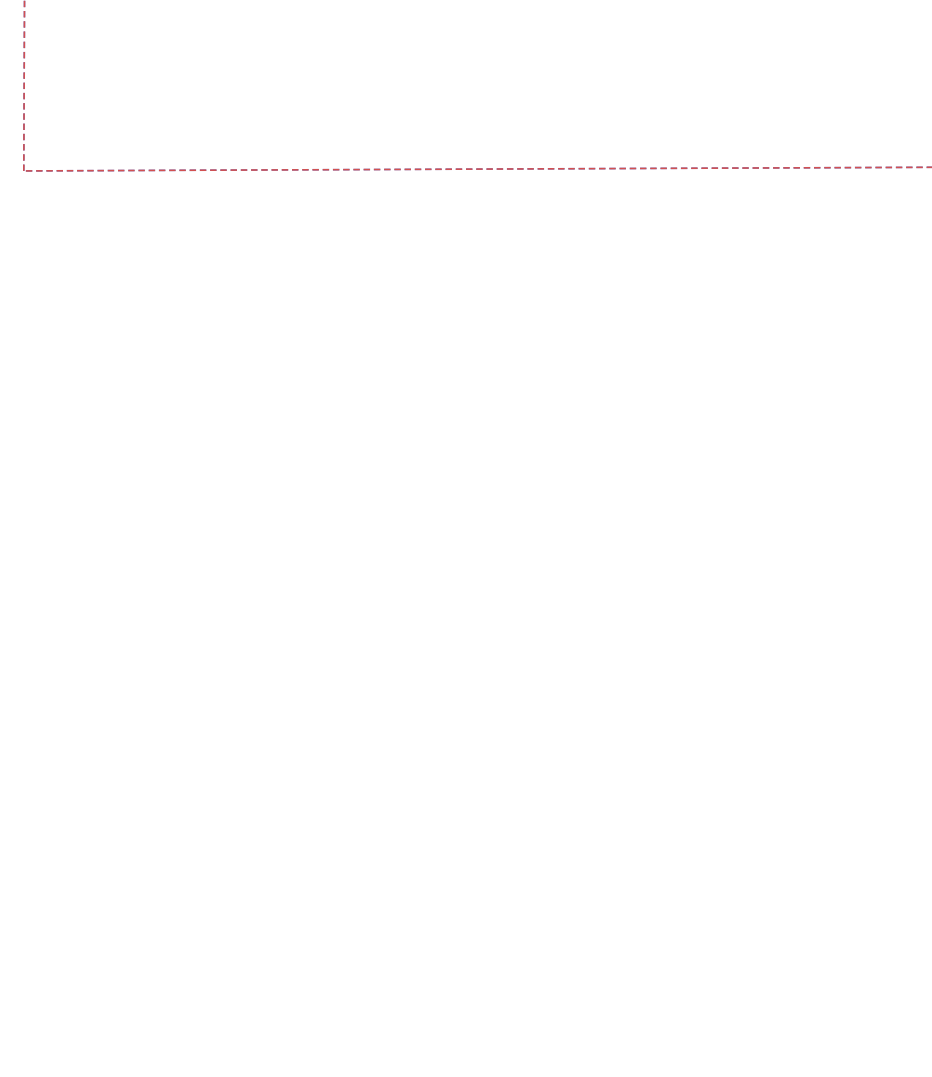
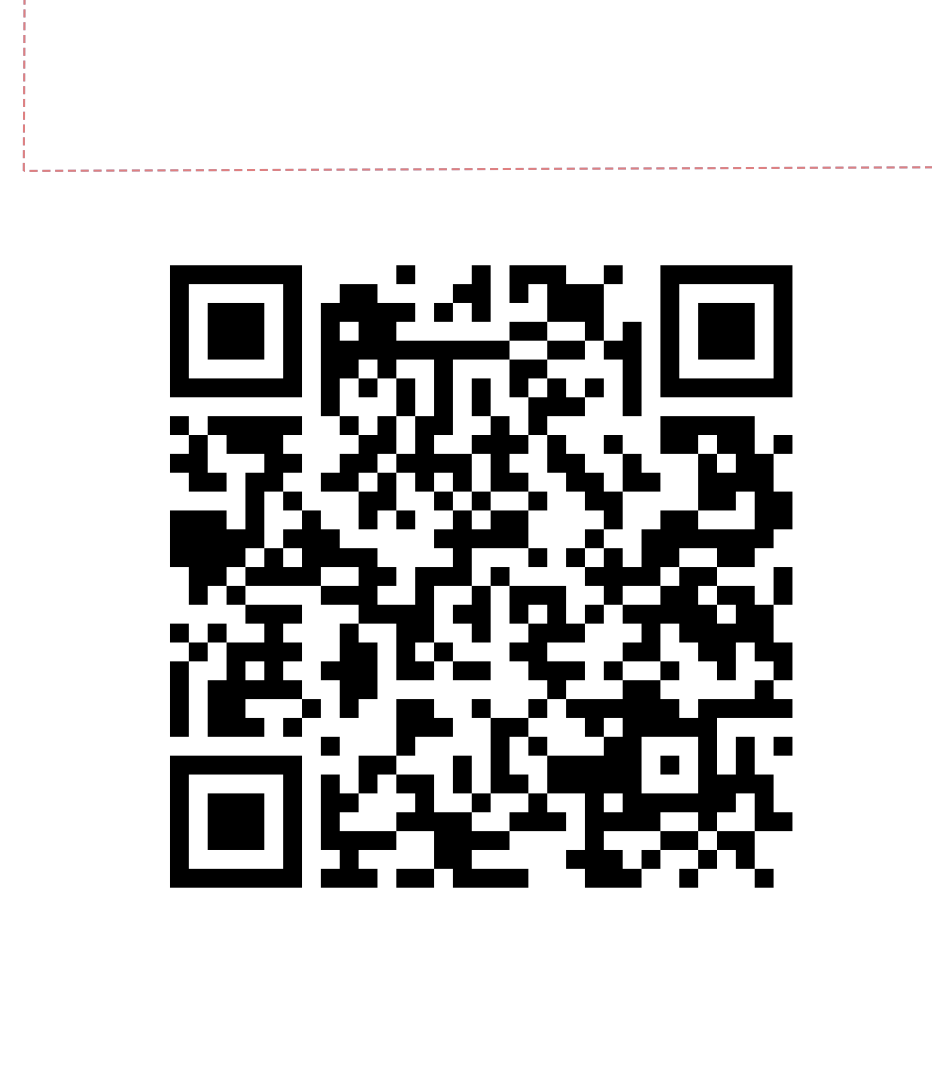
drawing: none -> [169, 265, 793, 888]

